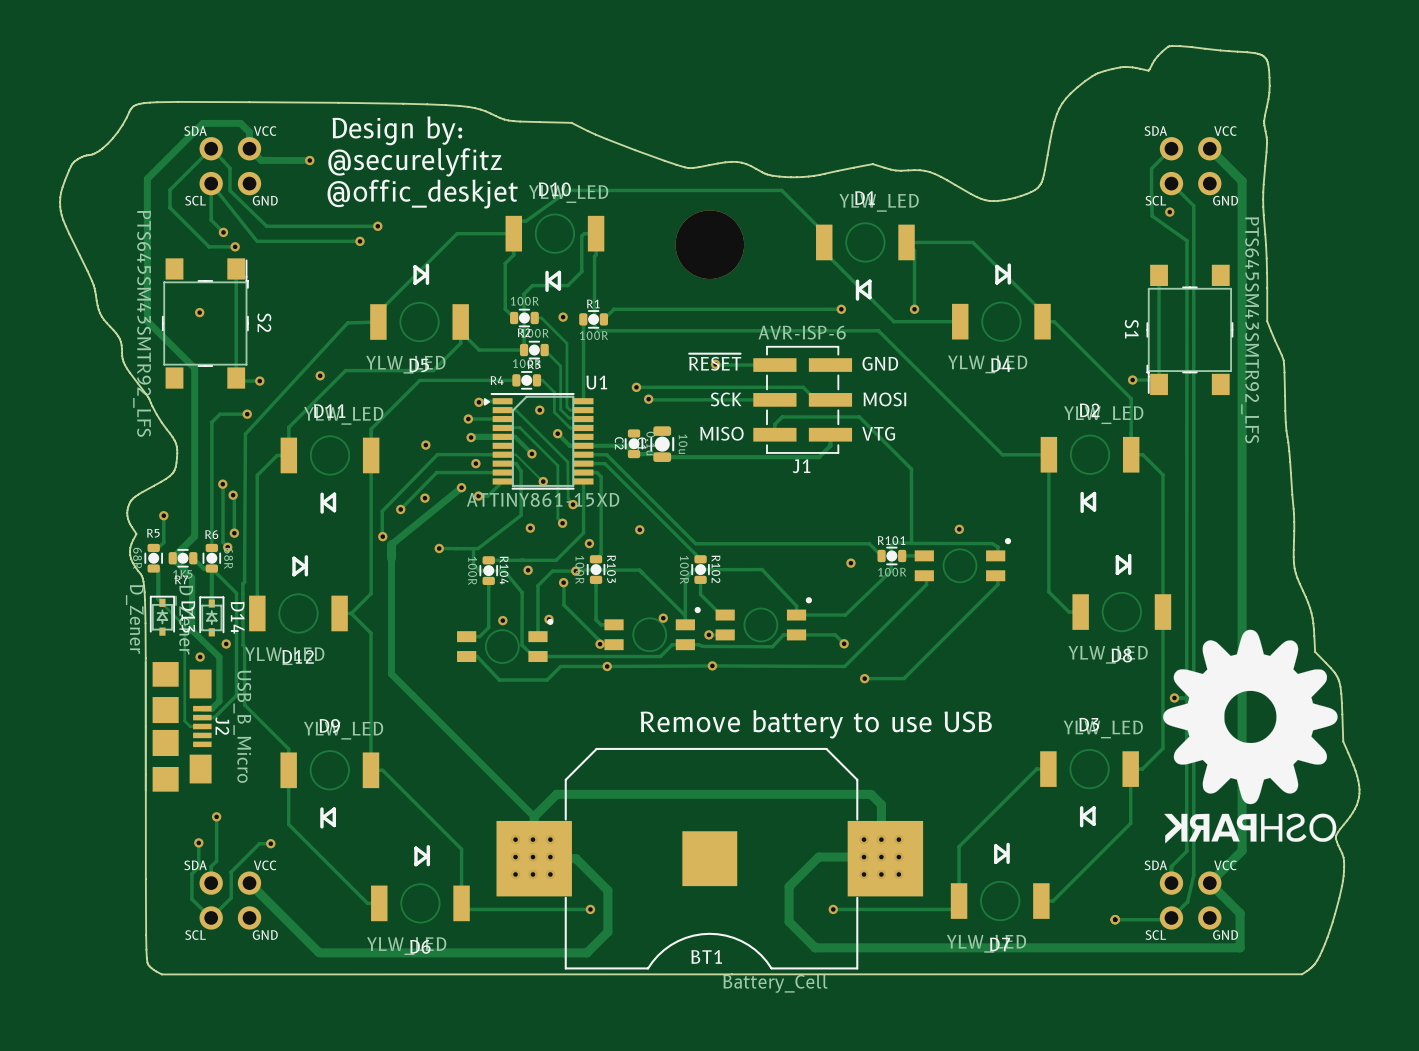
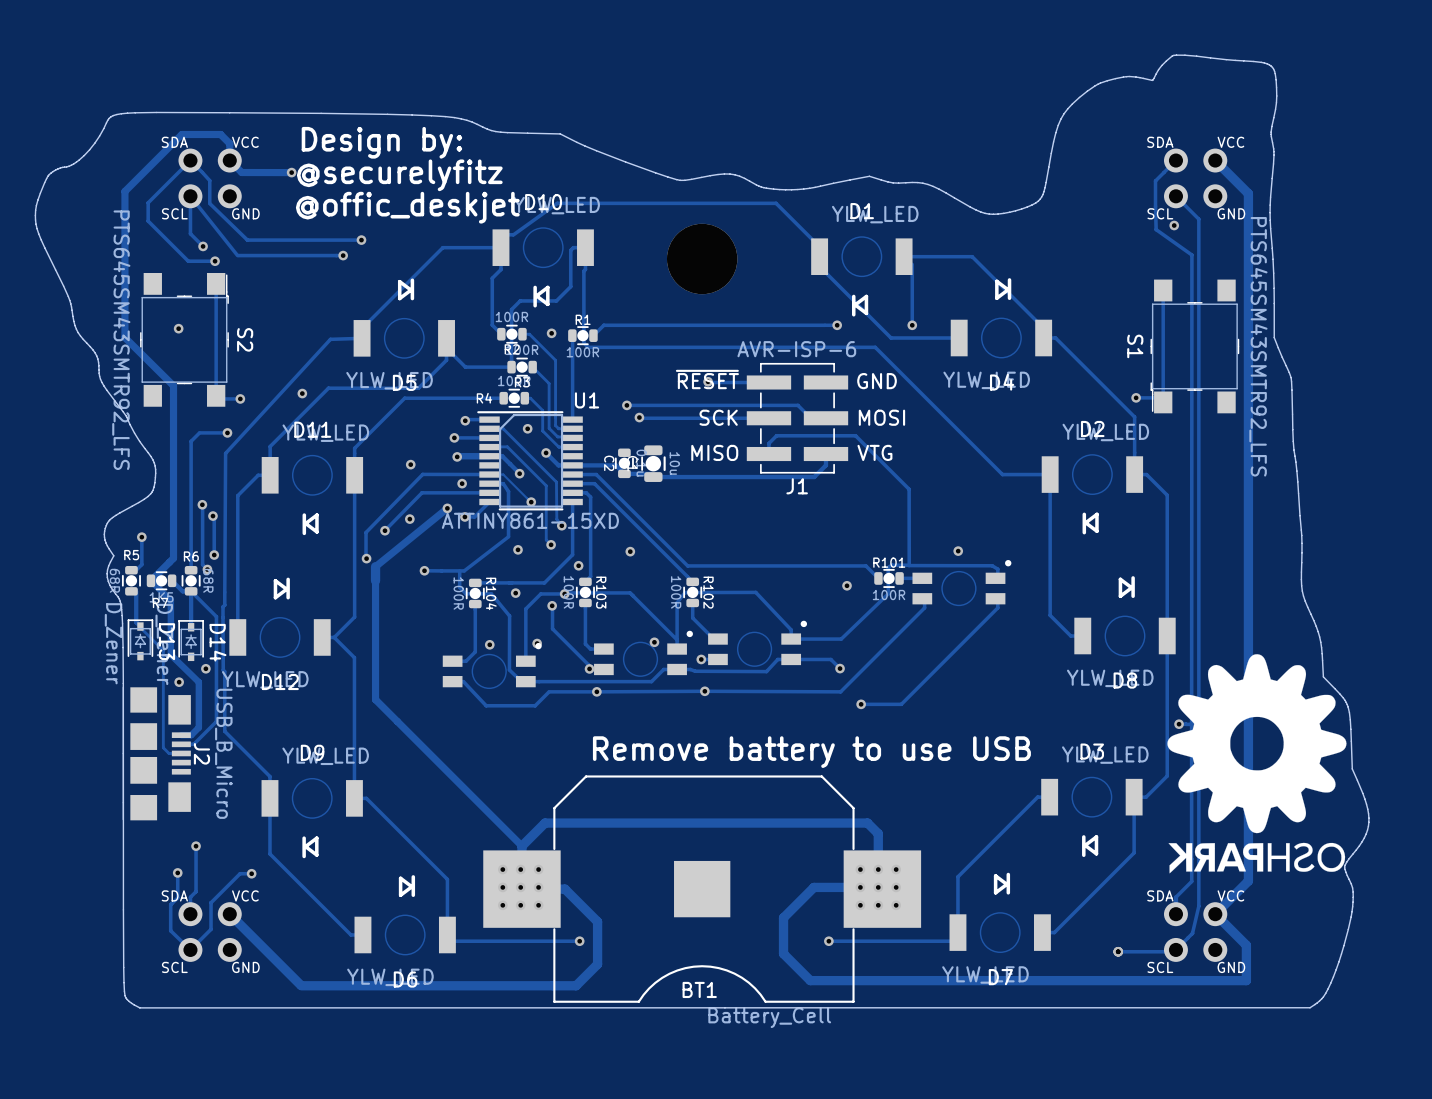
drawing: [483, 398, 490, 406] -> none

